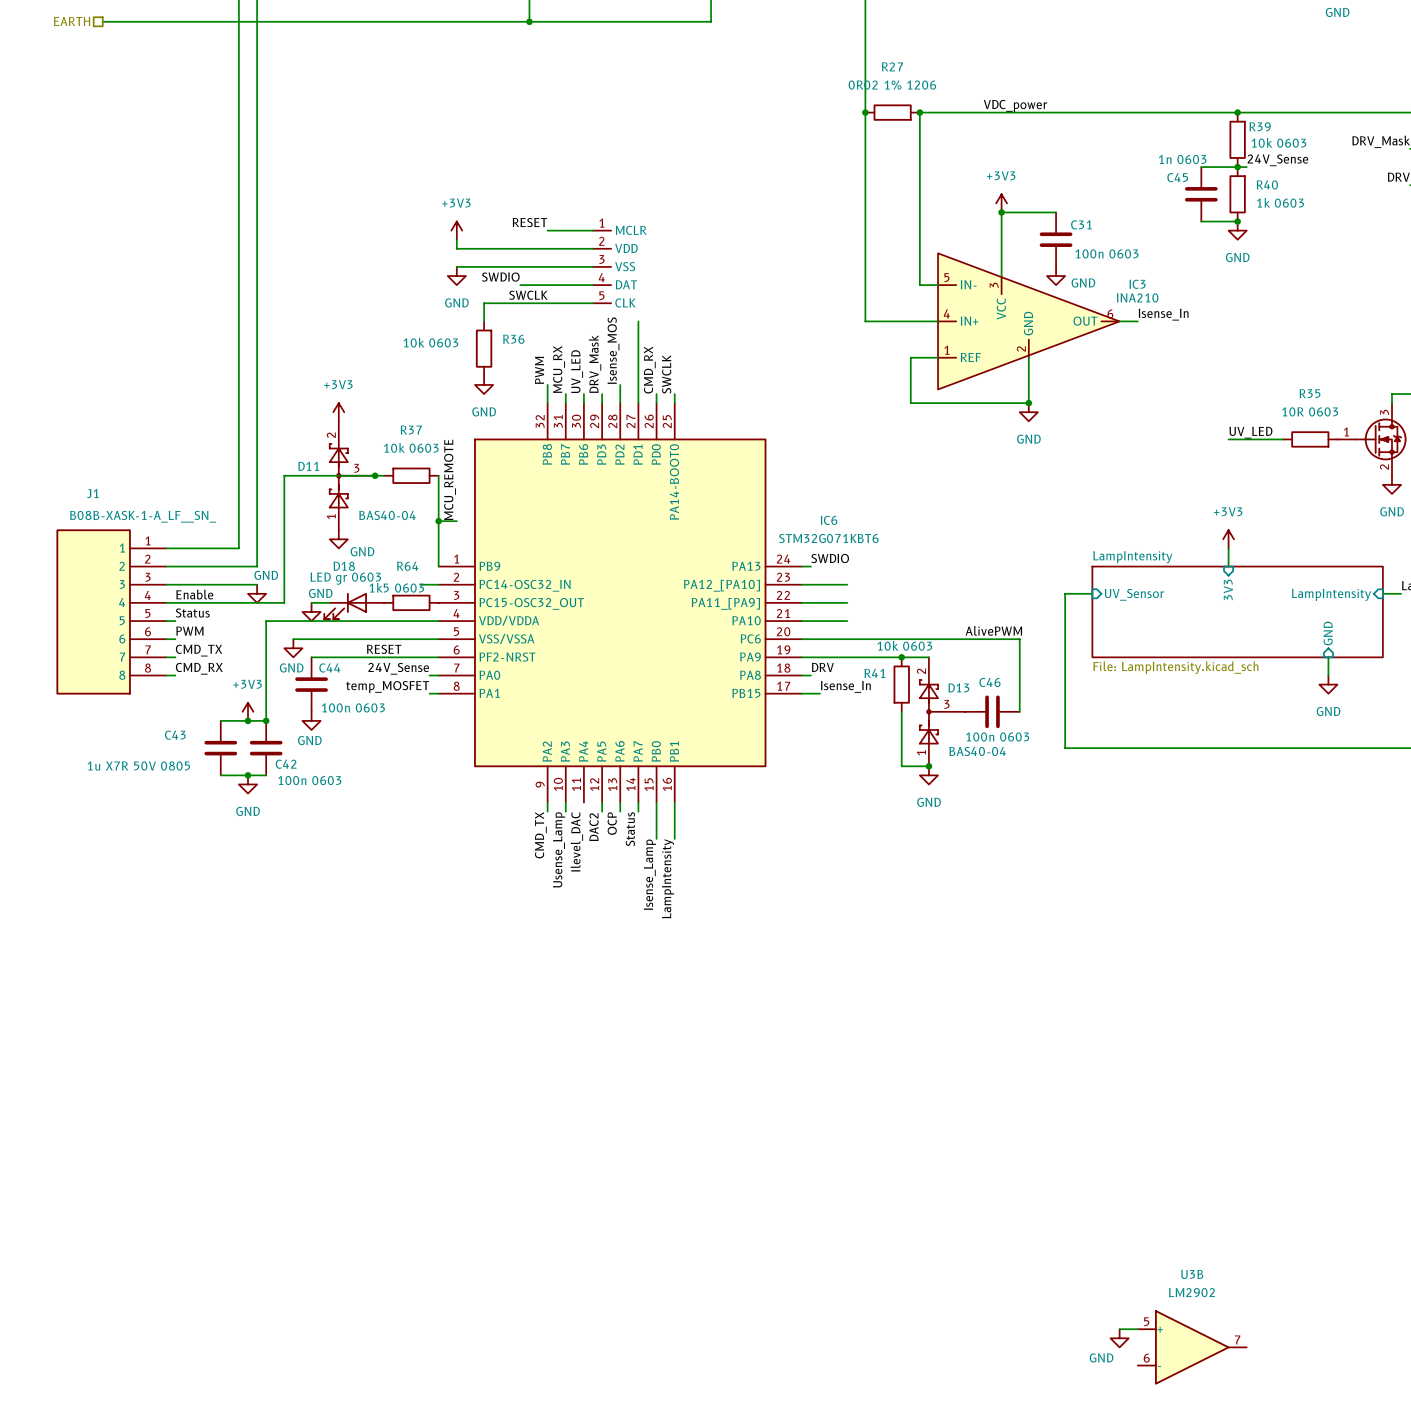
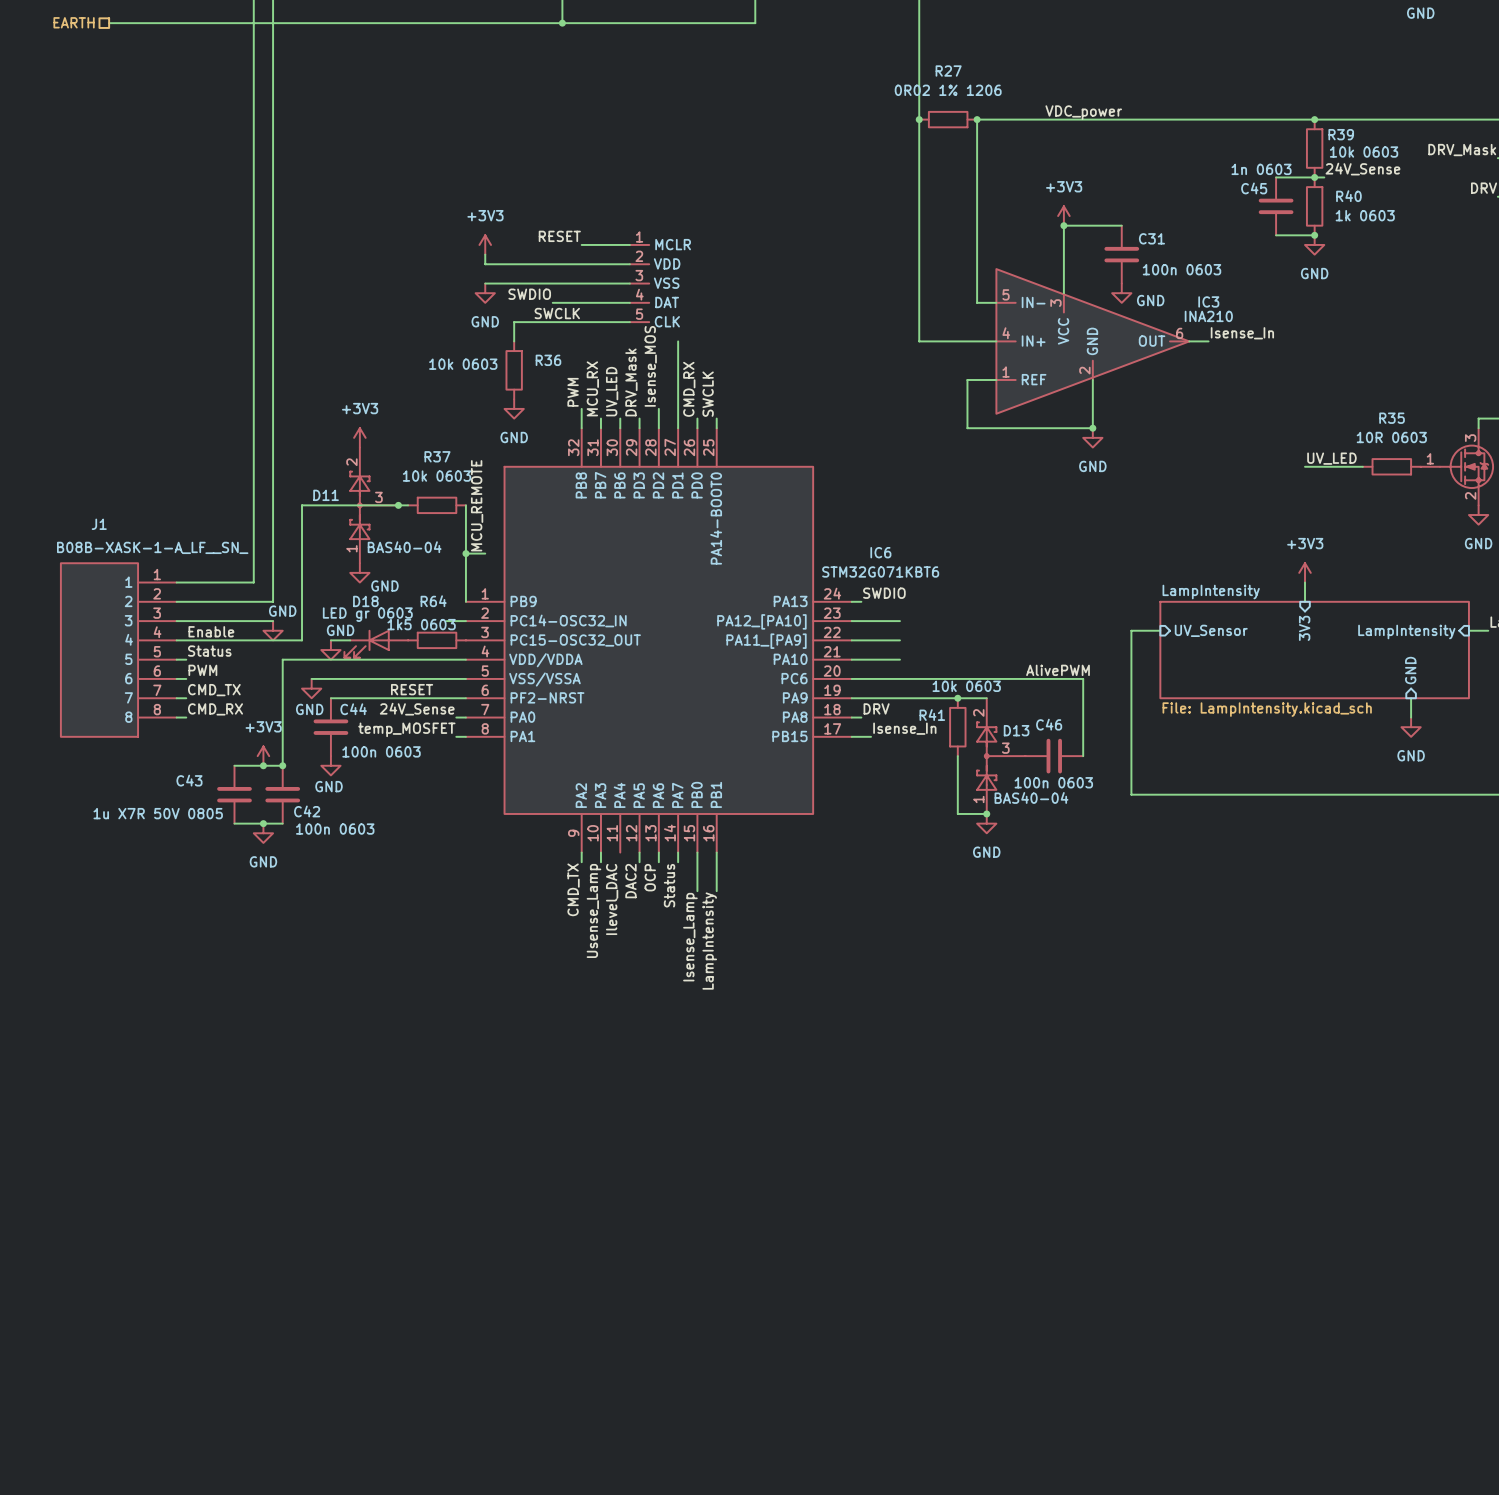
wire: (1119, 1329) (1137, 1329) -> none
power symbol: GND (1119, 1338) -> none
U3B: LM2902 (1192, 1347) -> none

